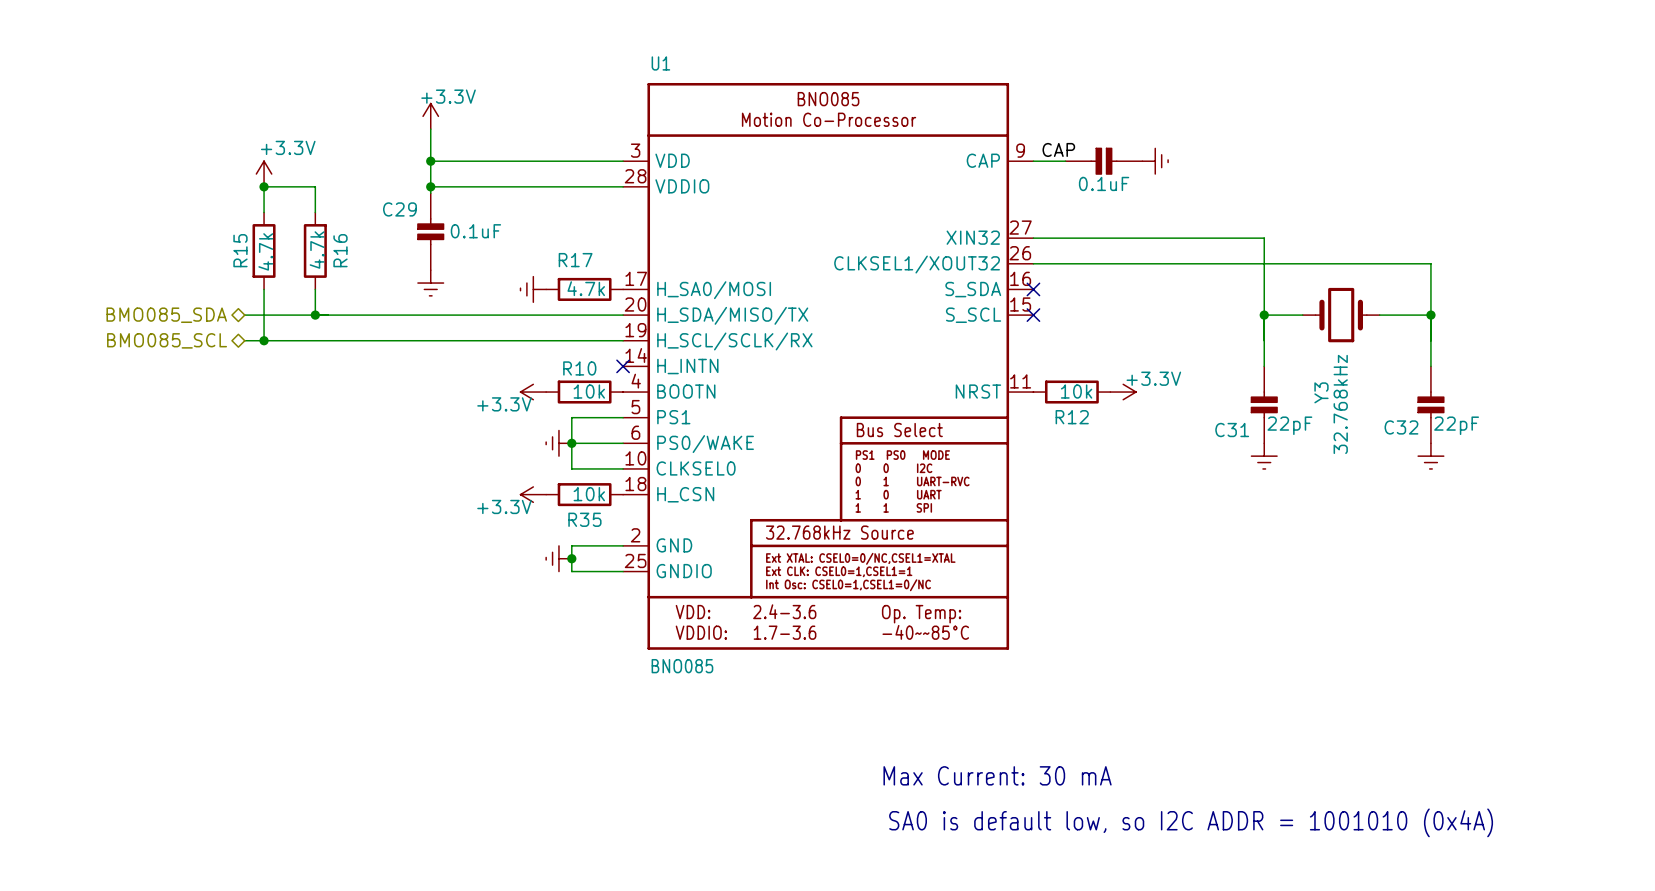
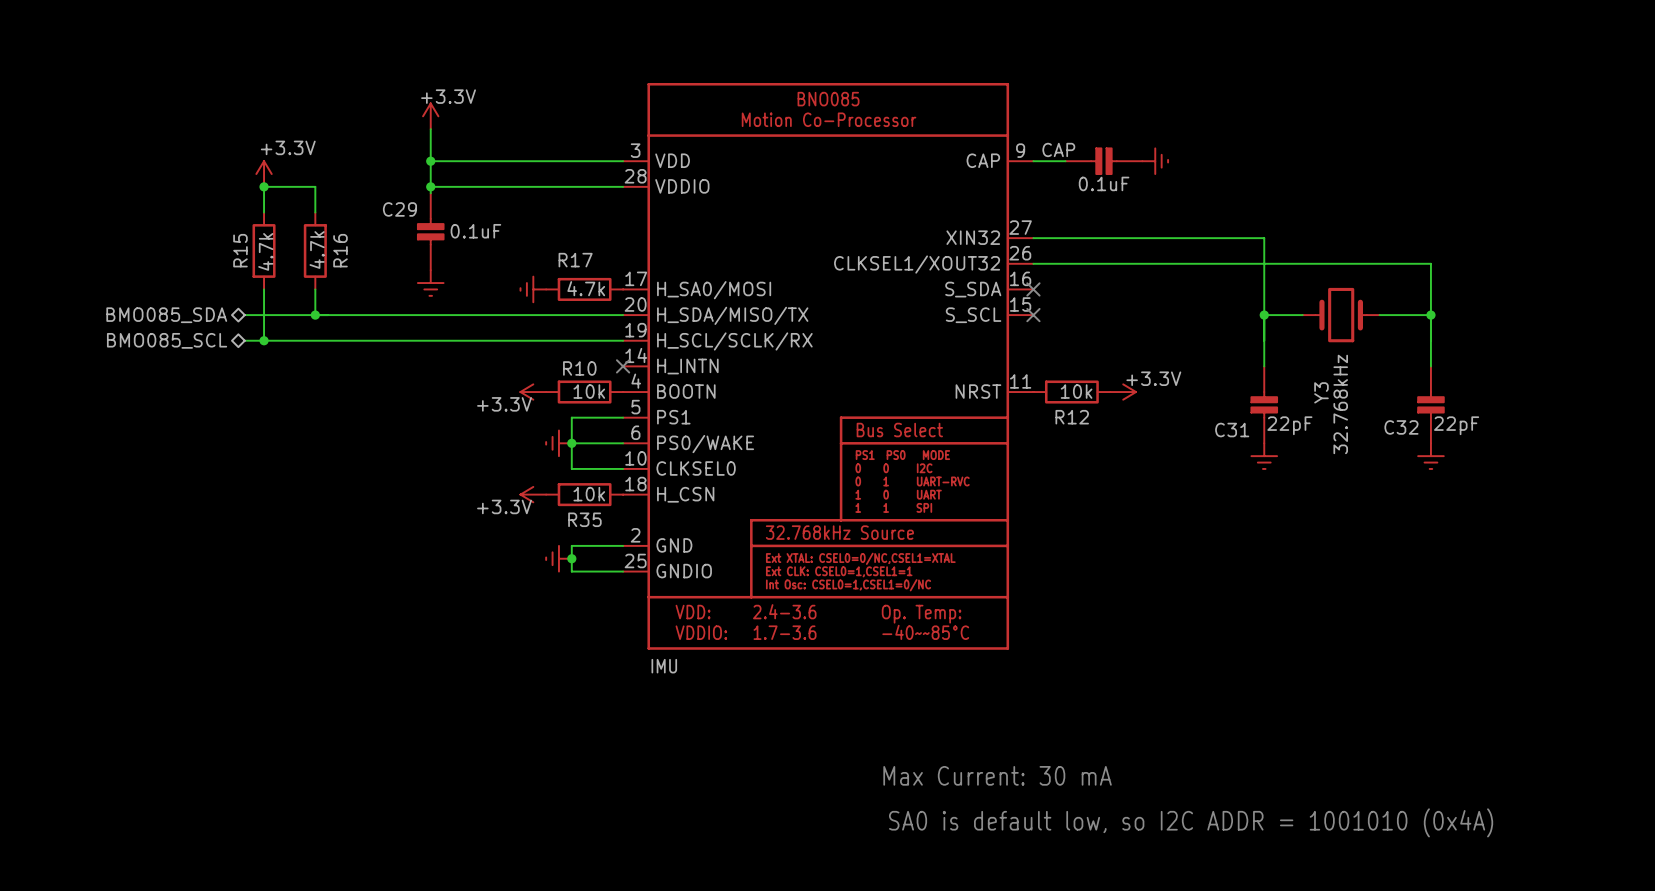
U1 name: U1 (660, 63) -> none
U1 value: BNO085 (682, 666) -> IMU (664, 666)

